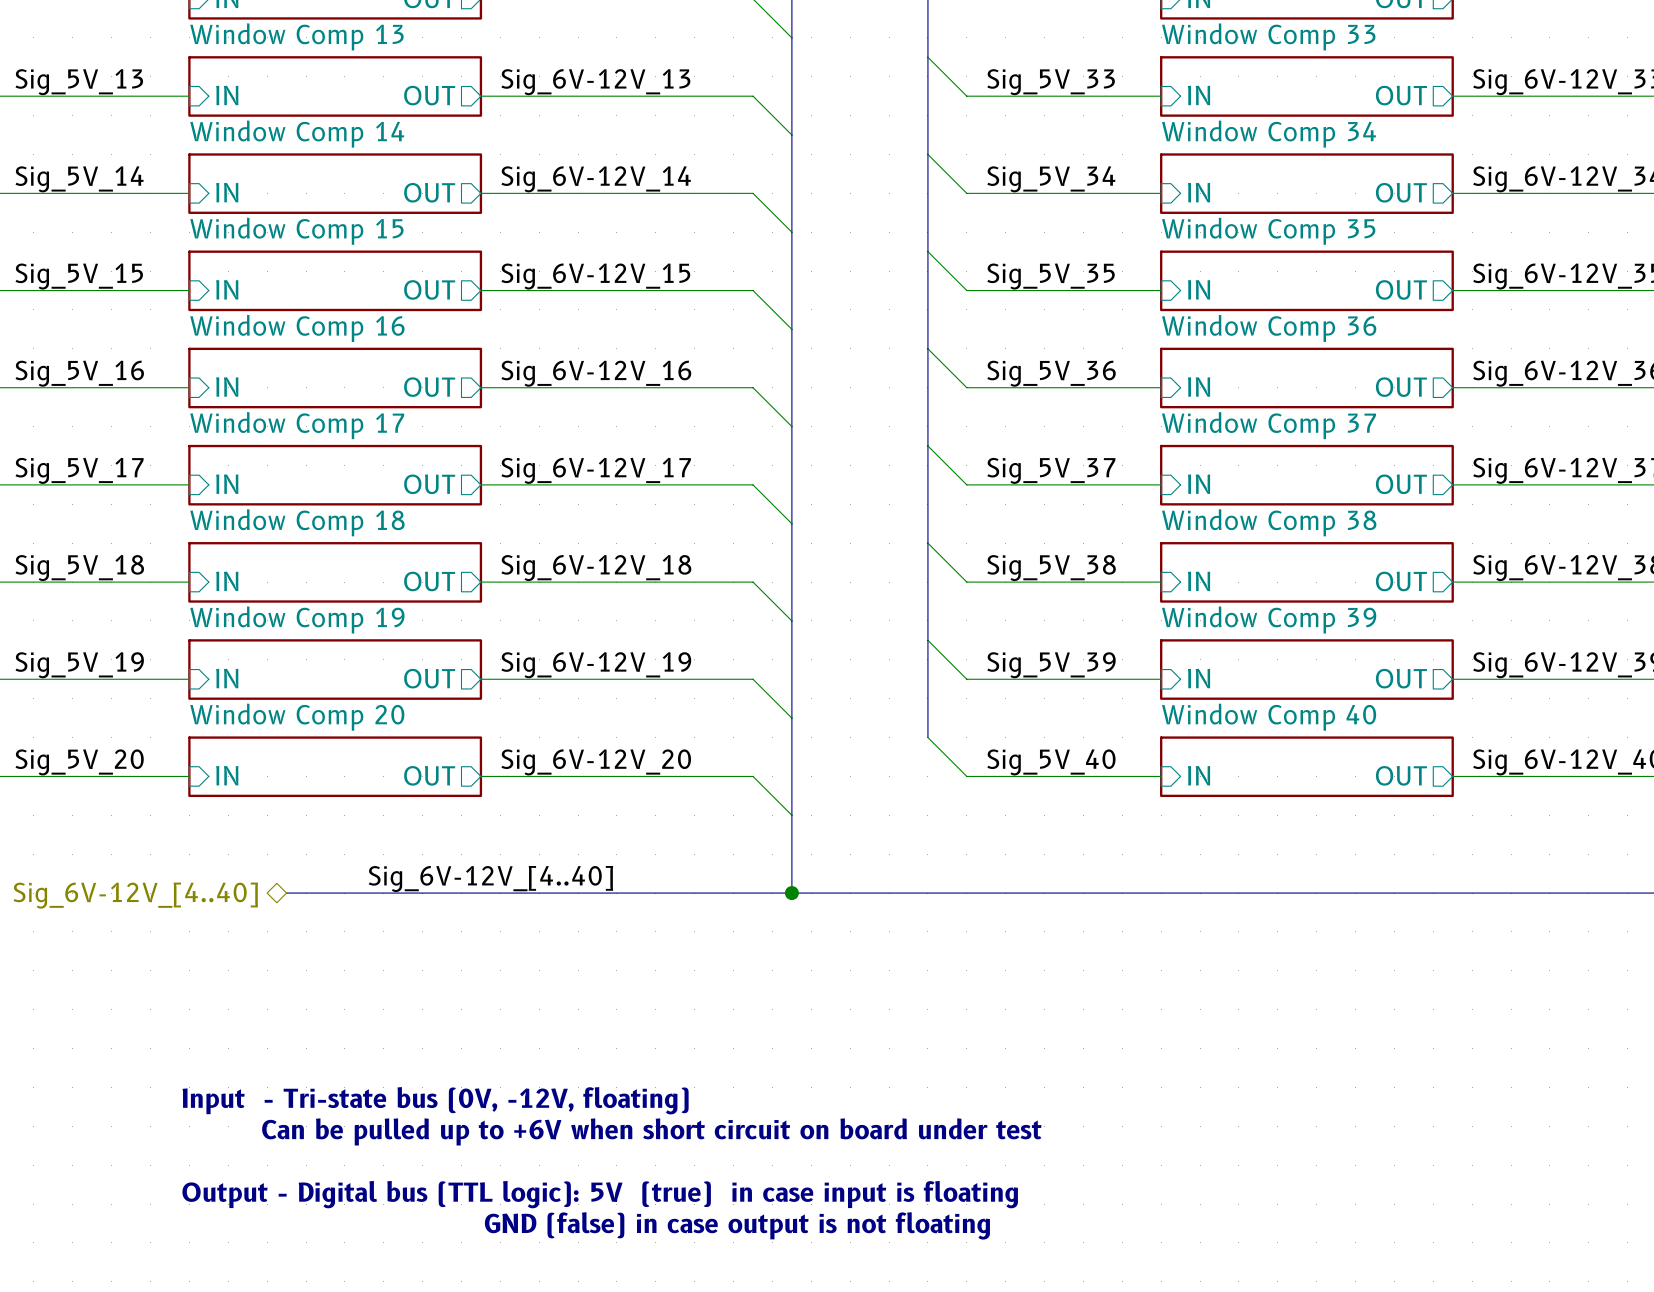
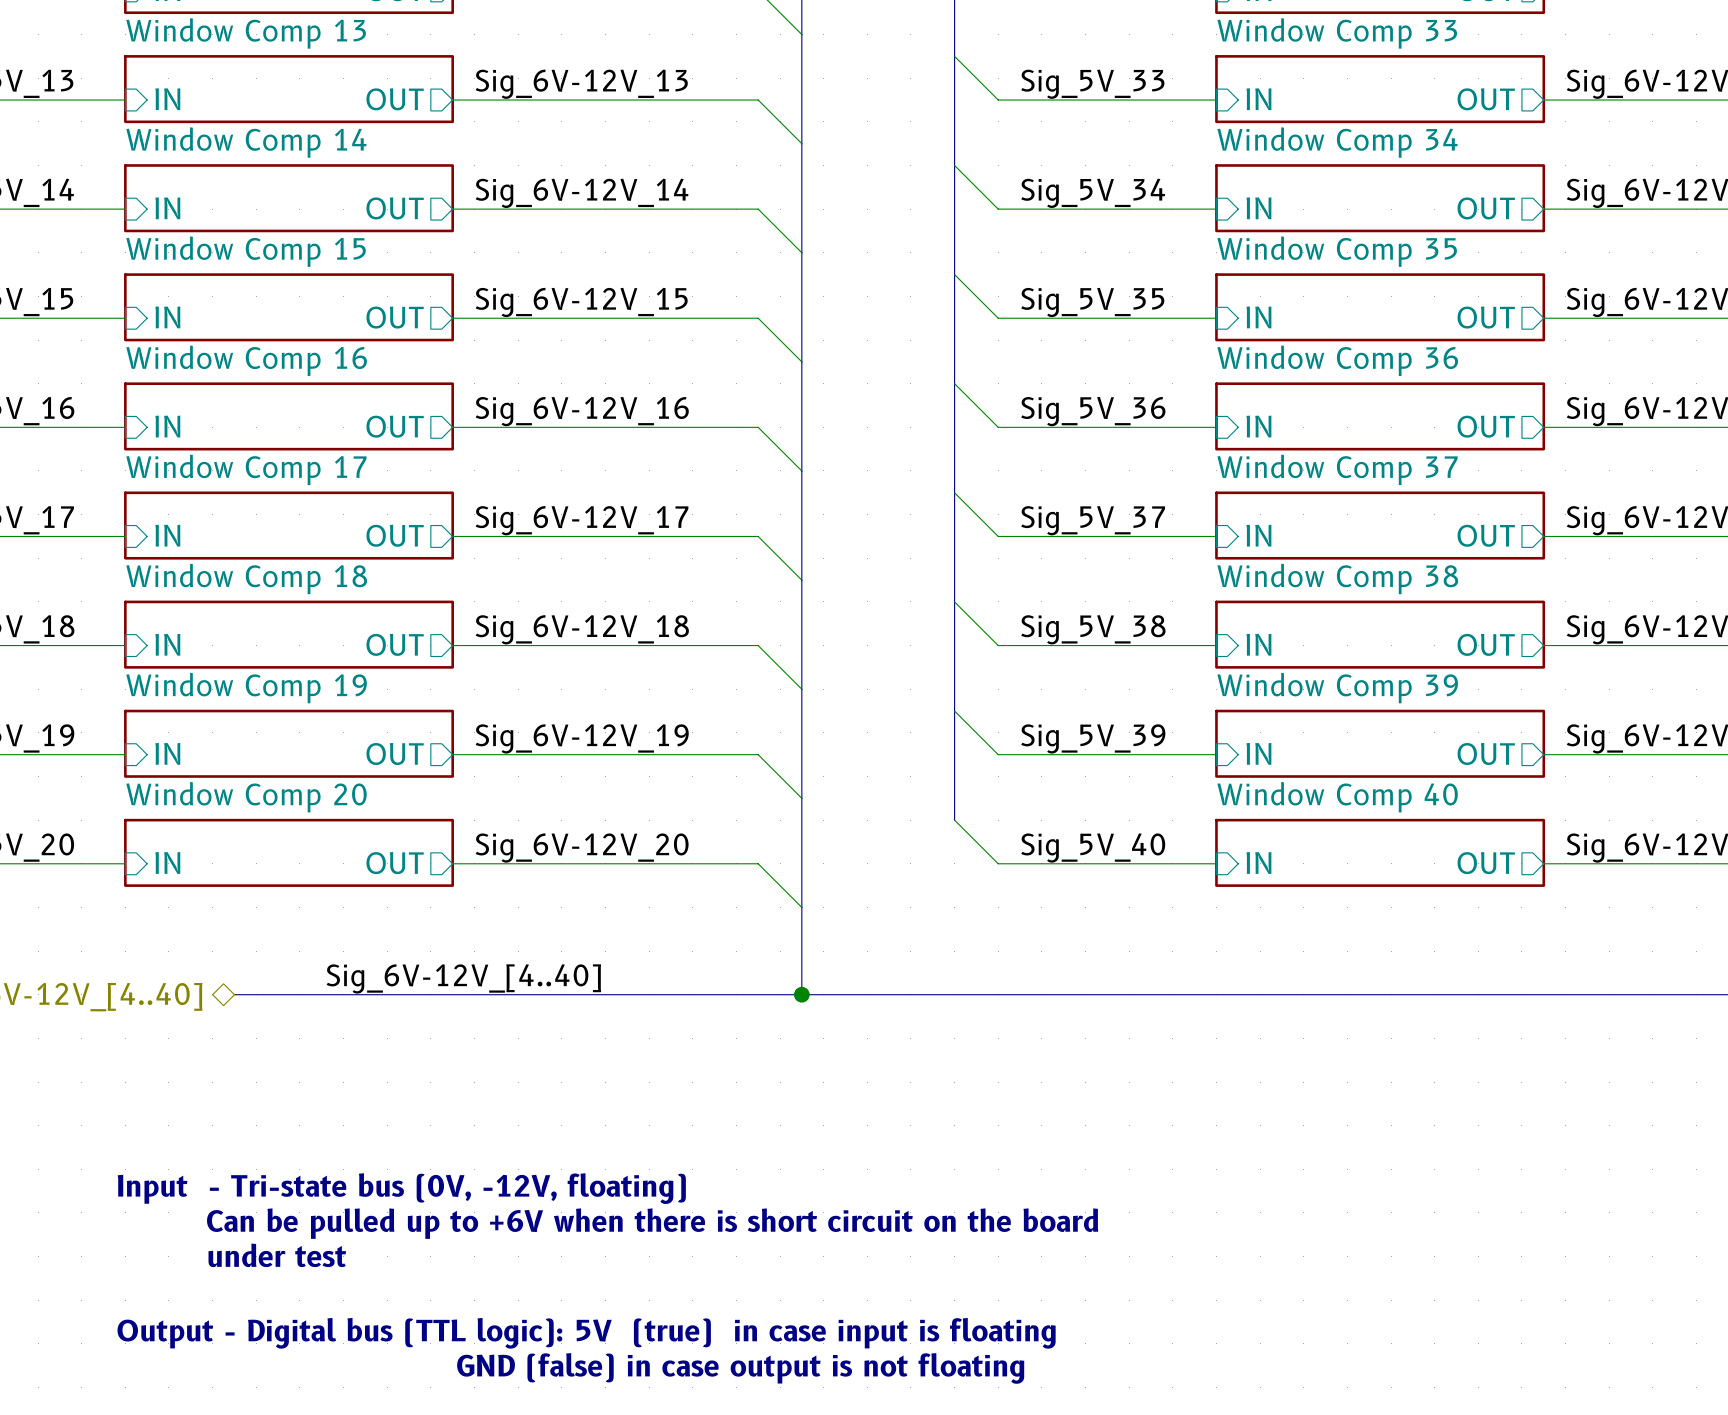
text: none -> Can be pulled up to +6V when there is short circuit on the board (652, 1223)
text position: Input - Tri-state bus (0V, -12V, floating) (435, 1100) -> Input - Tri-state bus (0V, -12V, floating) (401, 1188)
text: Can be pulled up to +6V when short circuit on board under test (651, 1131) -> under test (277, 1255)

